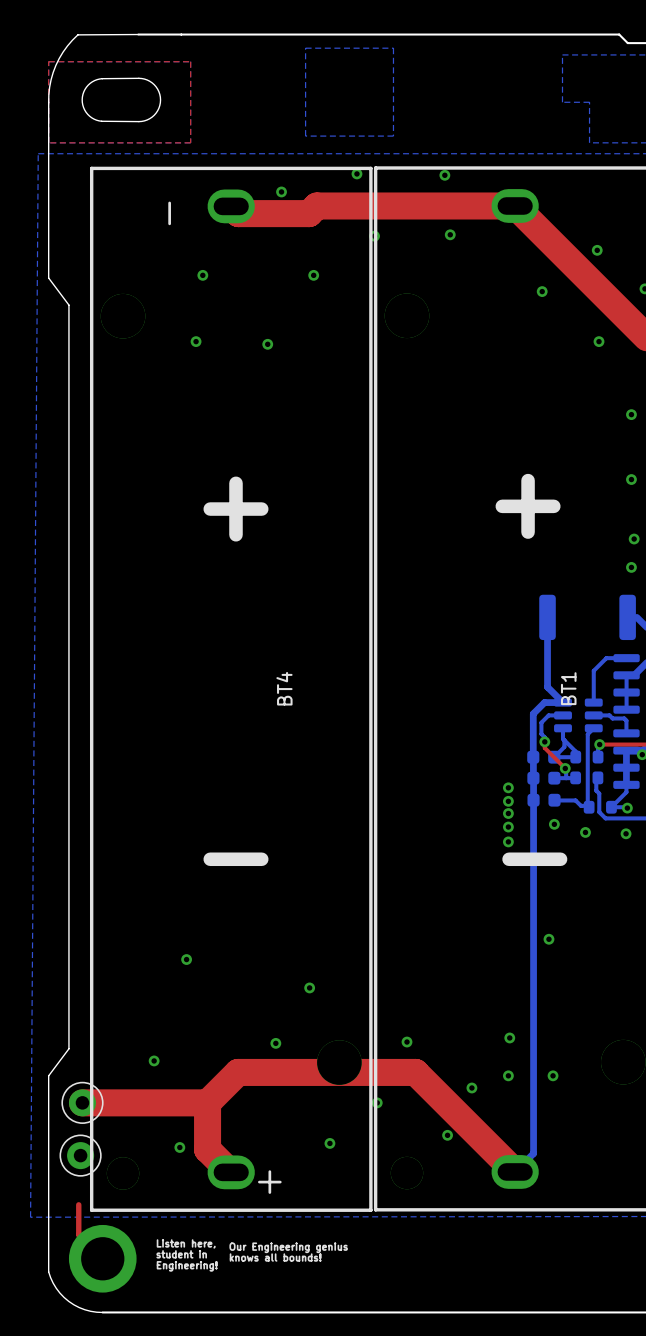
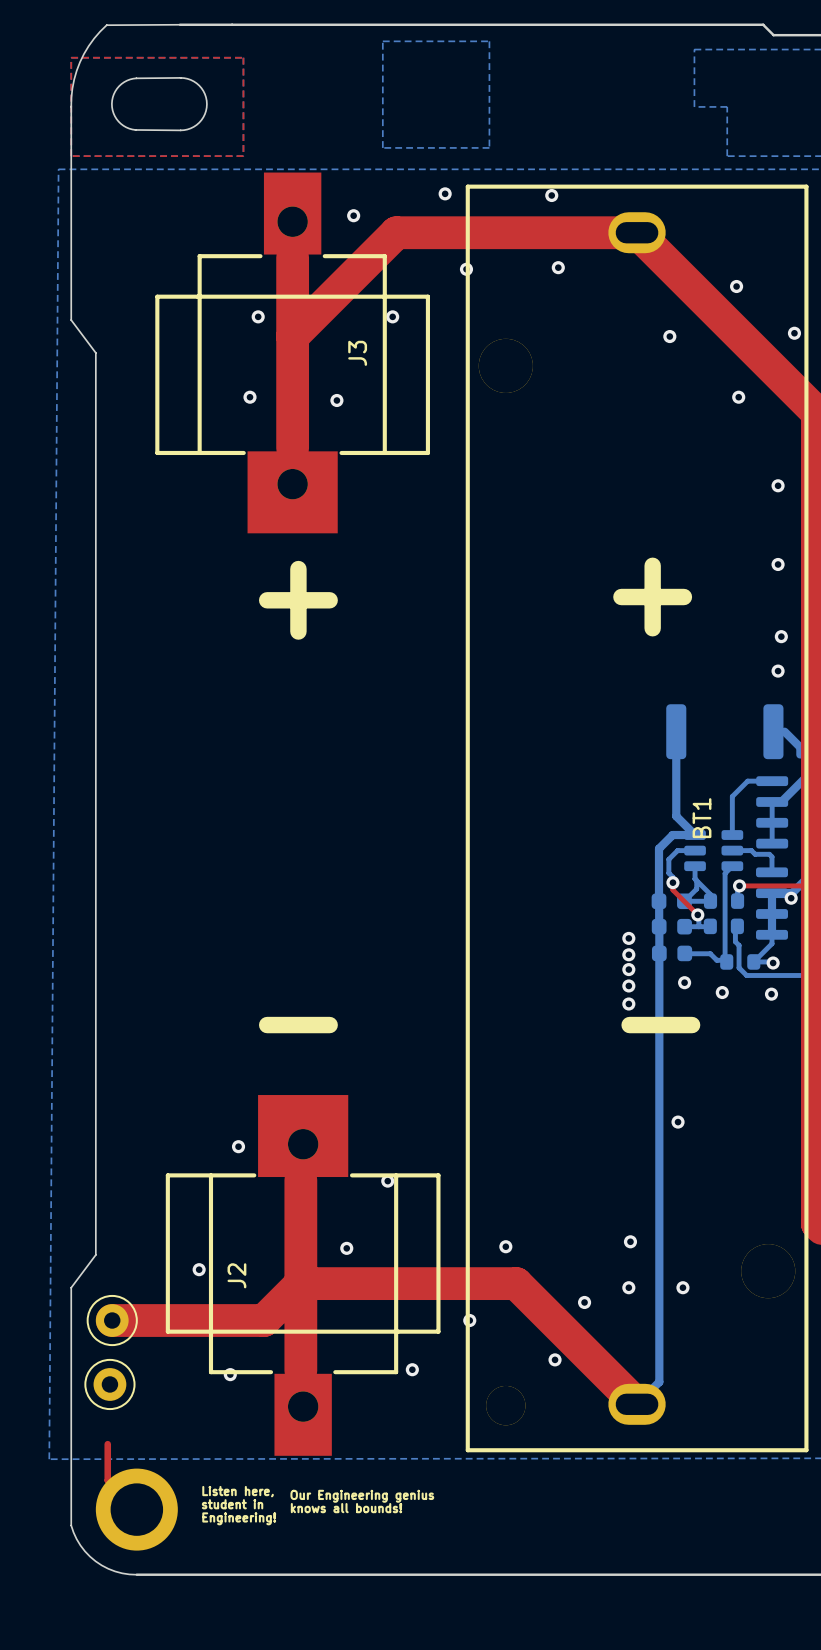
top track: (231, 206) (238, 213) (309, 213) -> (292, 336) (387, 241)
top track: none -> (292, 257) (292, 448)
J3: none -> (292, 352)
BT4: (231, 689) -> none
top track: none -> (300, 1179) (300, 1370)
J2: none -> (303, 1275)
top track: (207, 1102) (207, 1149) (229, 1171) -> none

